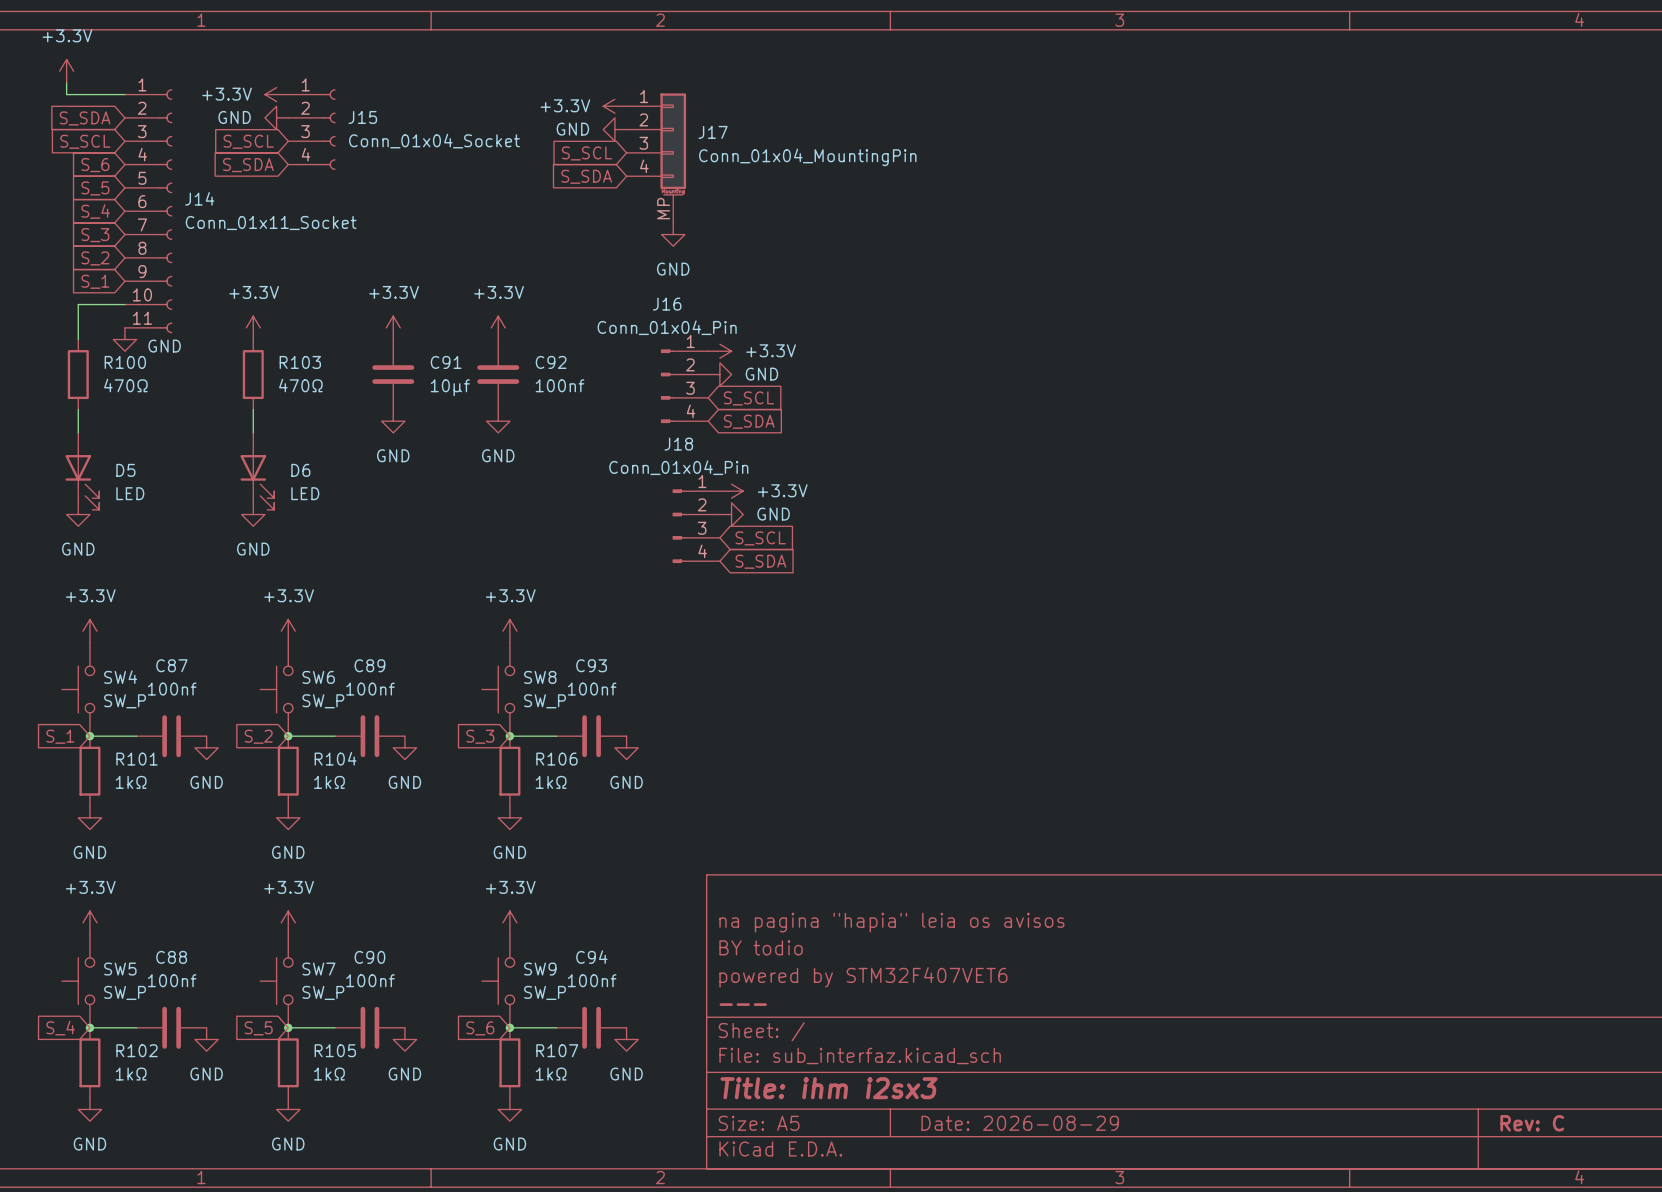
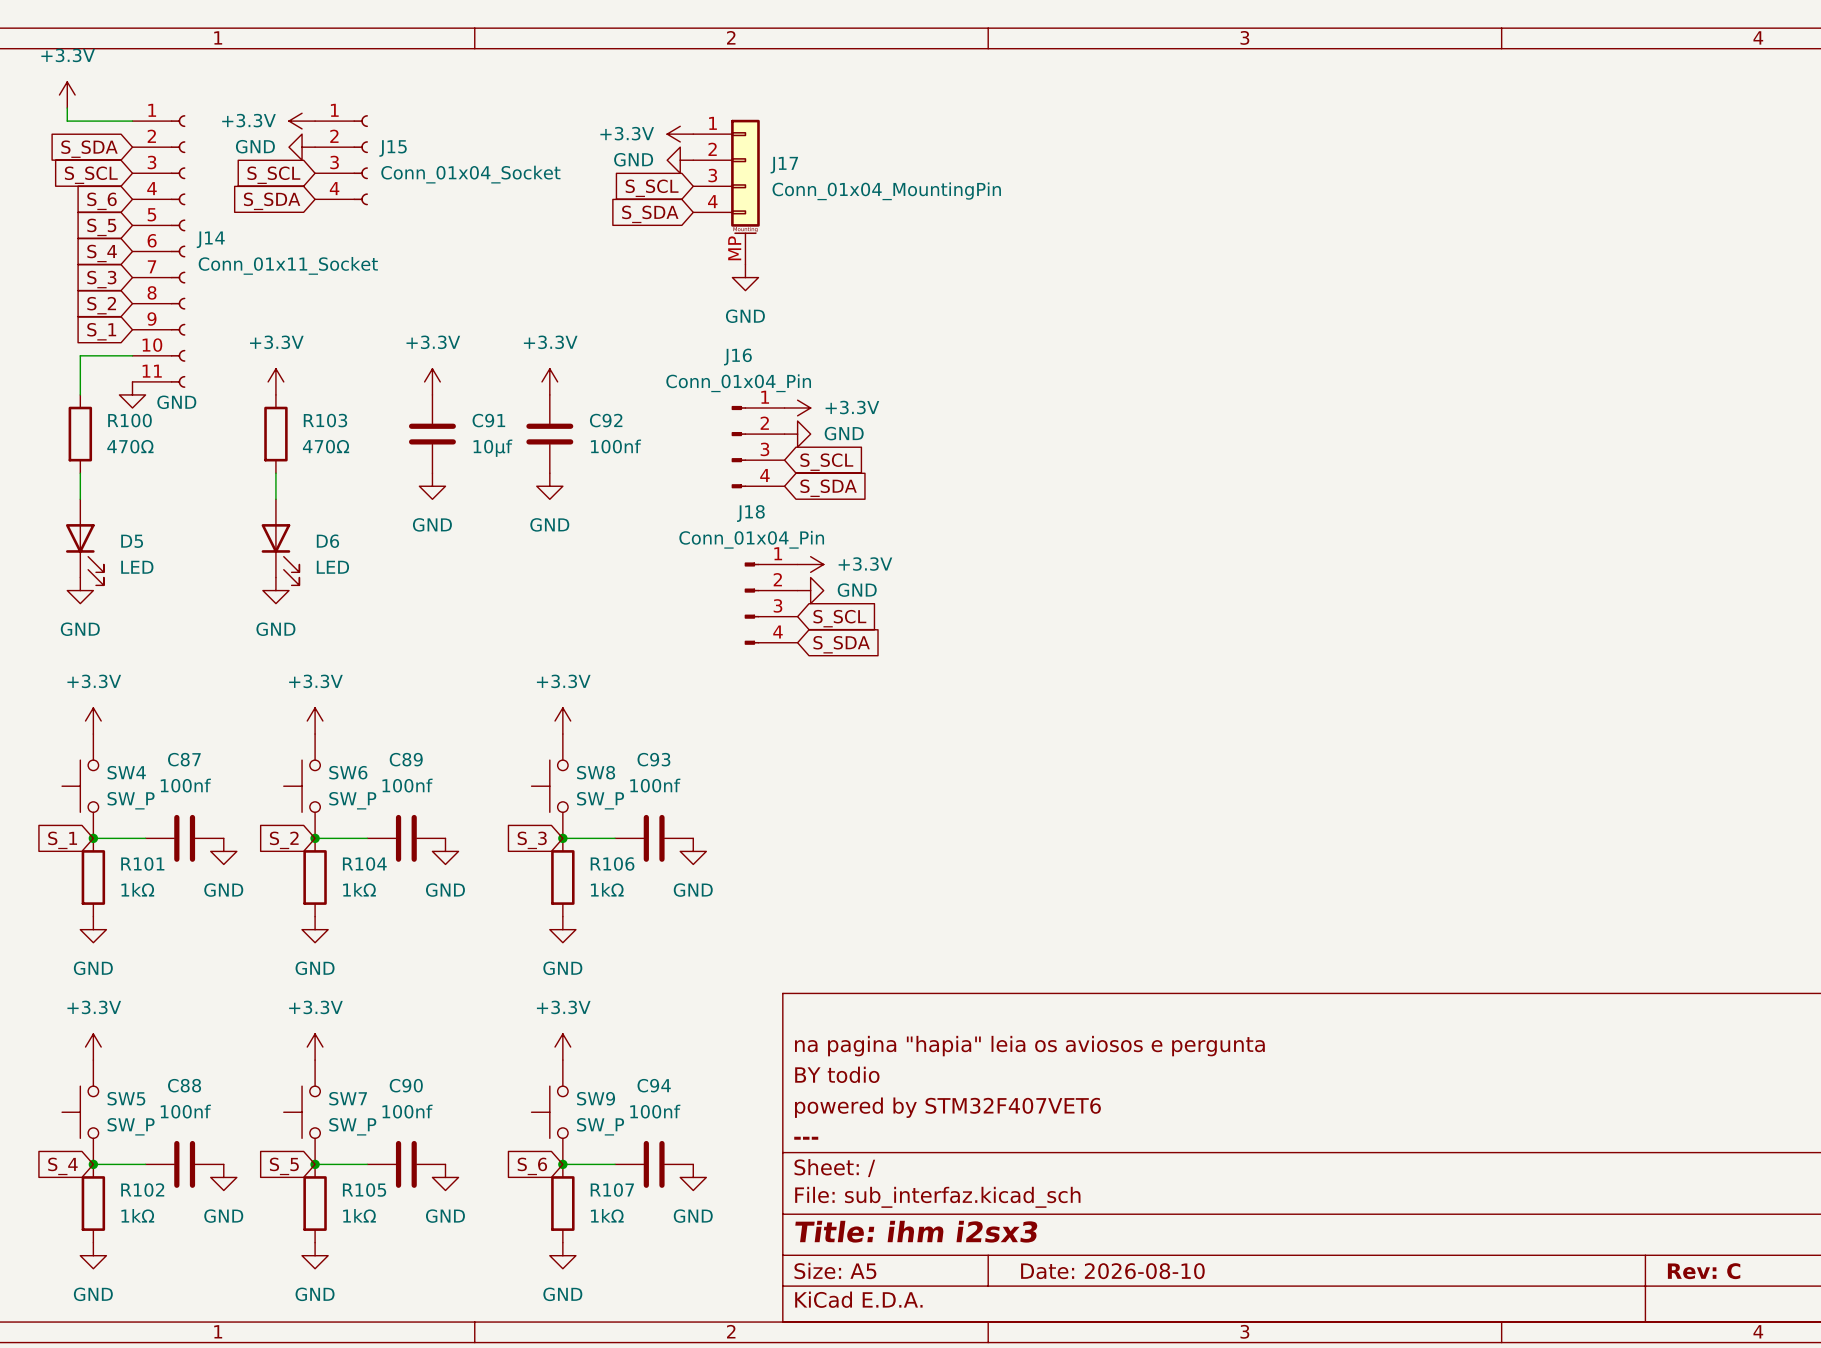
title block: na pagina "hapia" leia os avisos (891, 922) -> na pagina "hapia" leia os aviosos e pergunta (1029, 1046)
title block: Date: 2026-08-29 (1020, 1123) -> Date: 2026-08-10 (1112, 1271)

